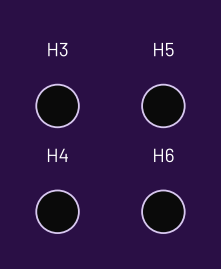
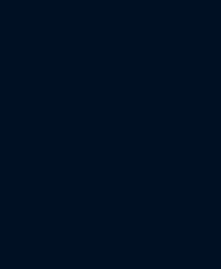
H3: (57, 105) -> none
H5: (163, 105) -> none
H4: (57, 211) -> none
H6: (163, 211) -> none

